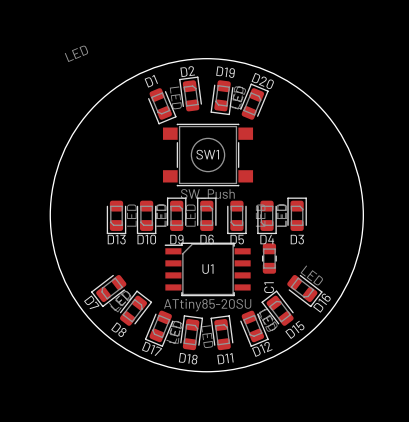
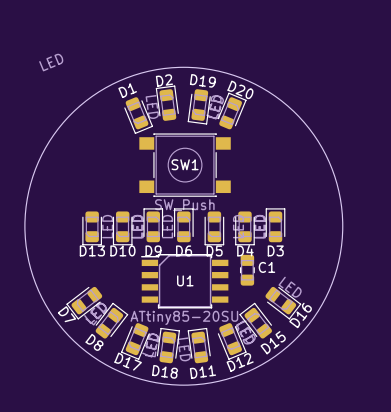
C1 name rotation: 0° (269, 287) -> 90° clockwise (266, 267)
C1 name position: C1 (269, 287) -> C1 (266, 267)

